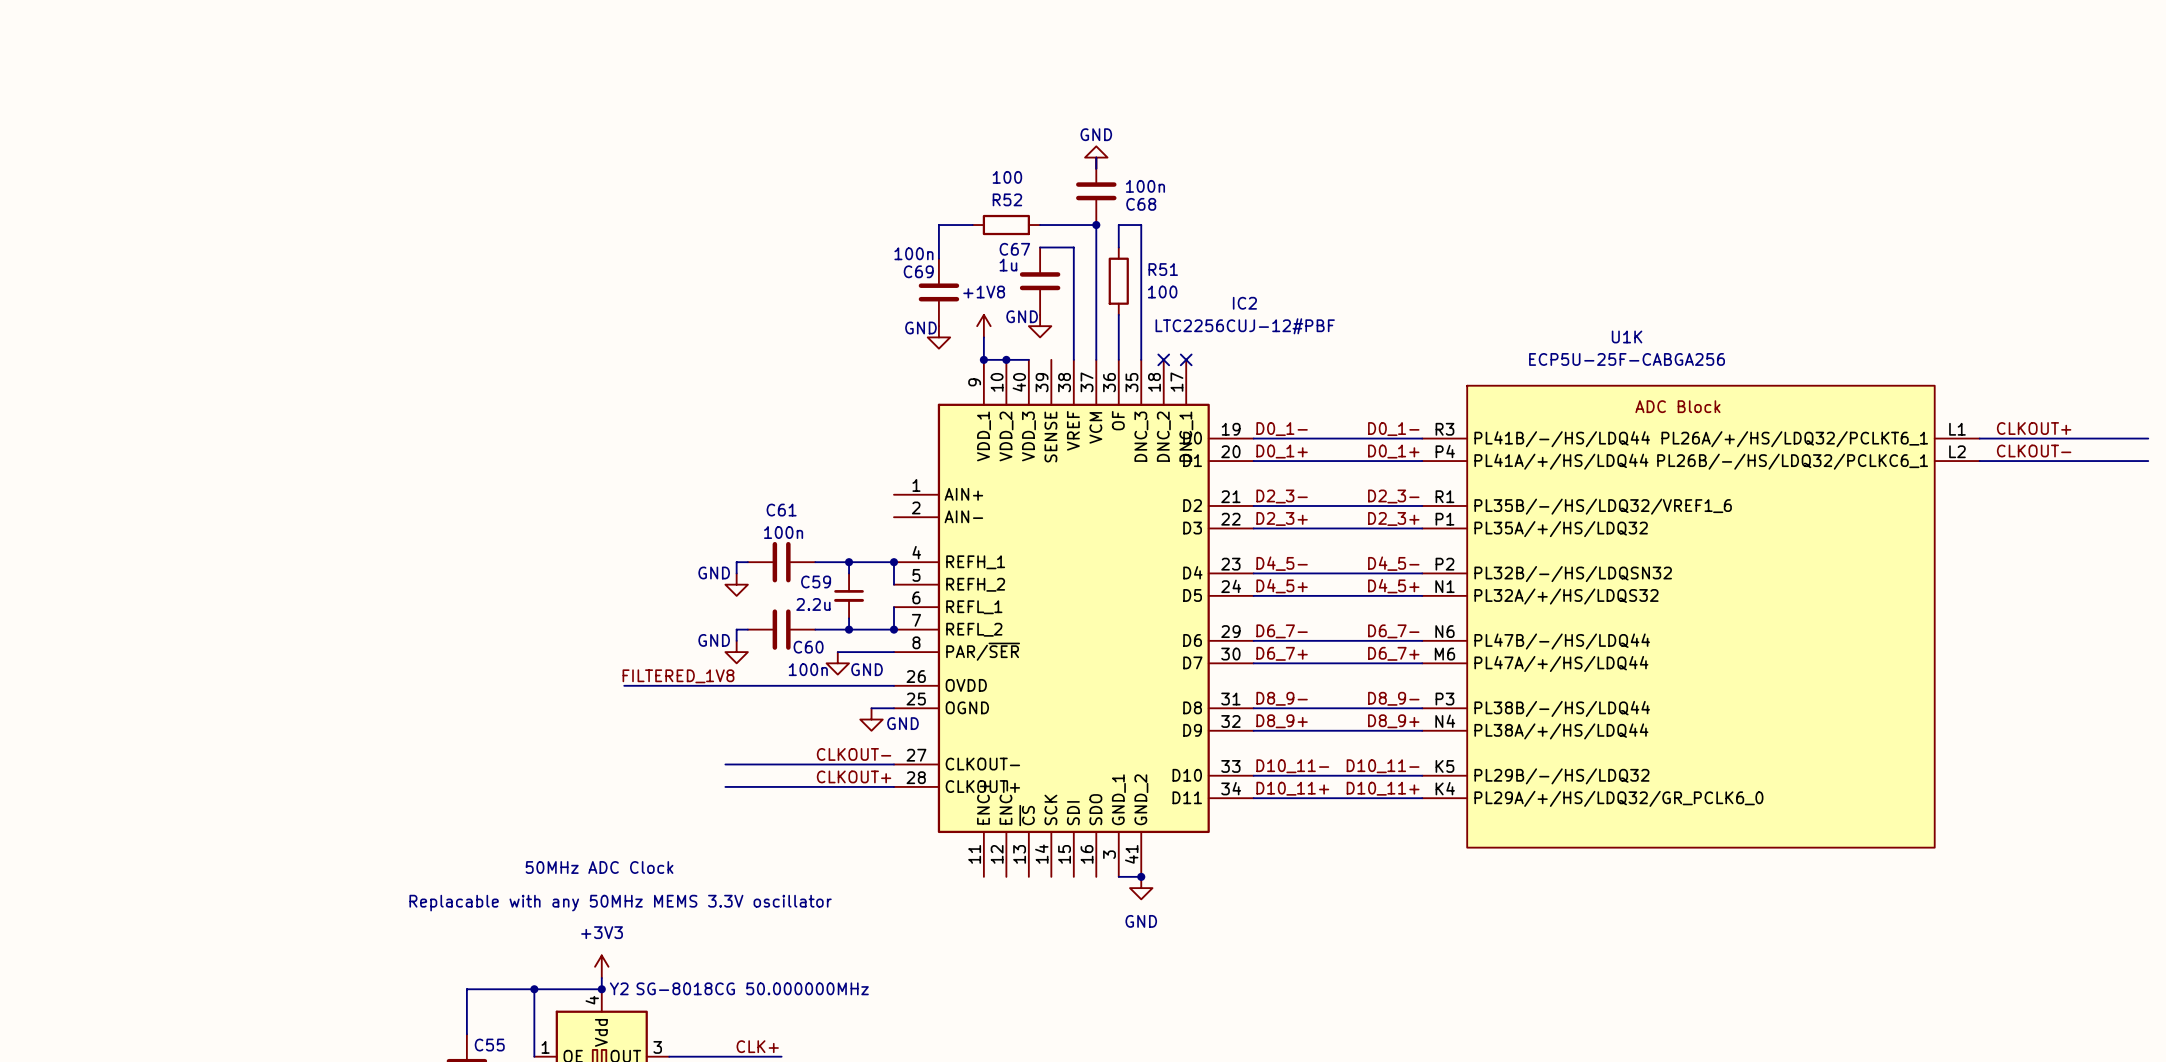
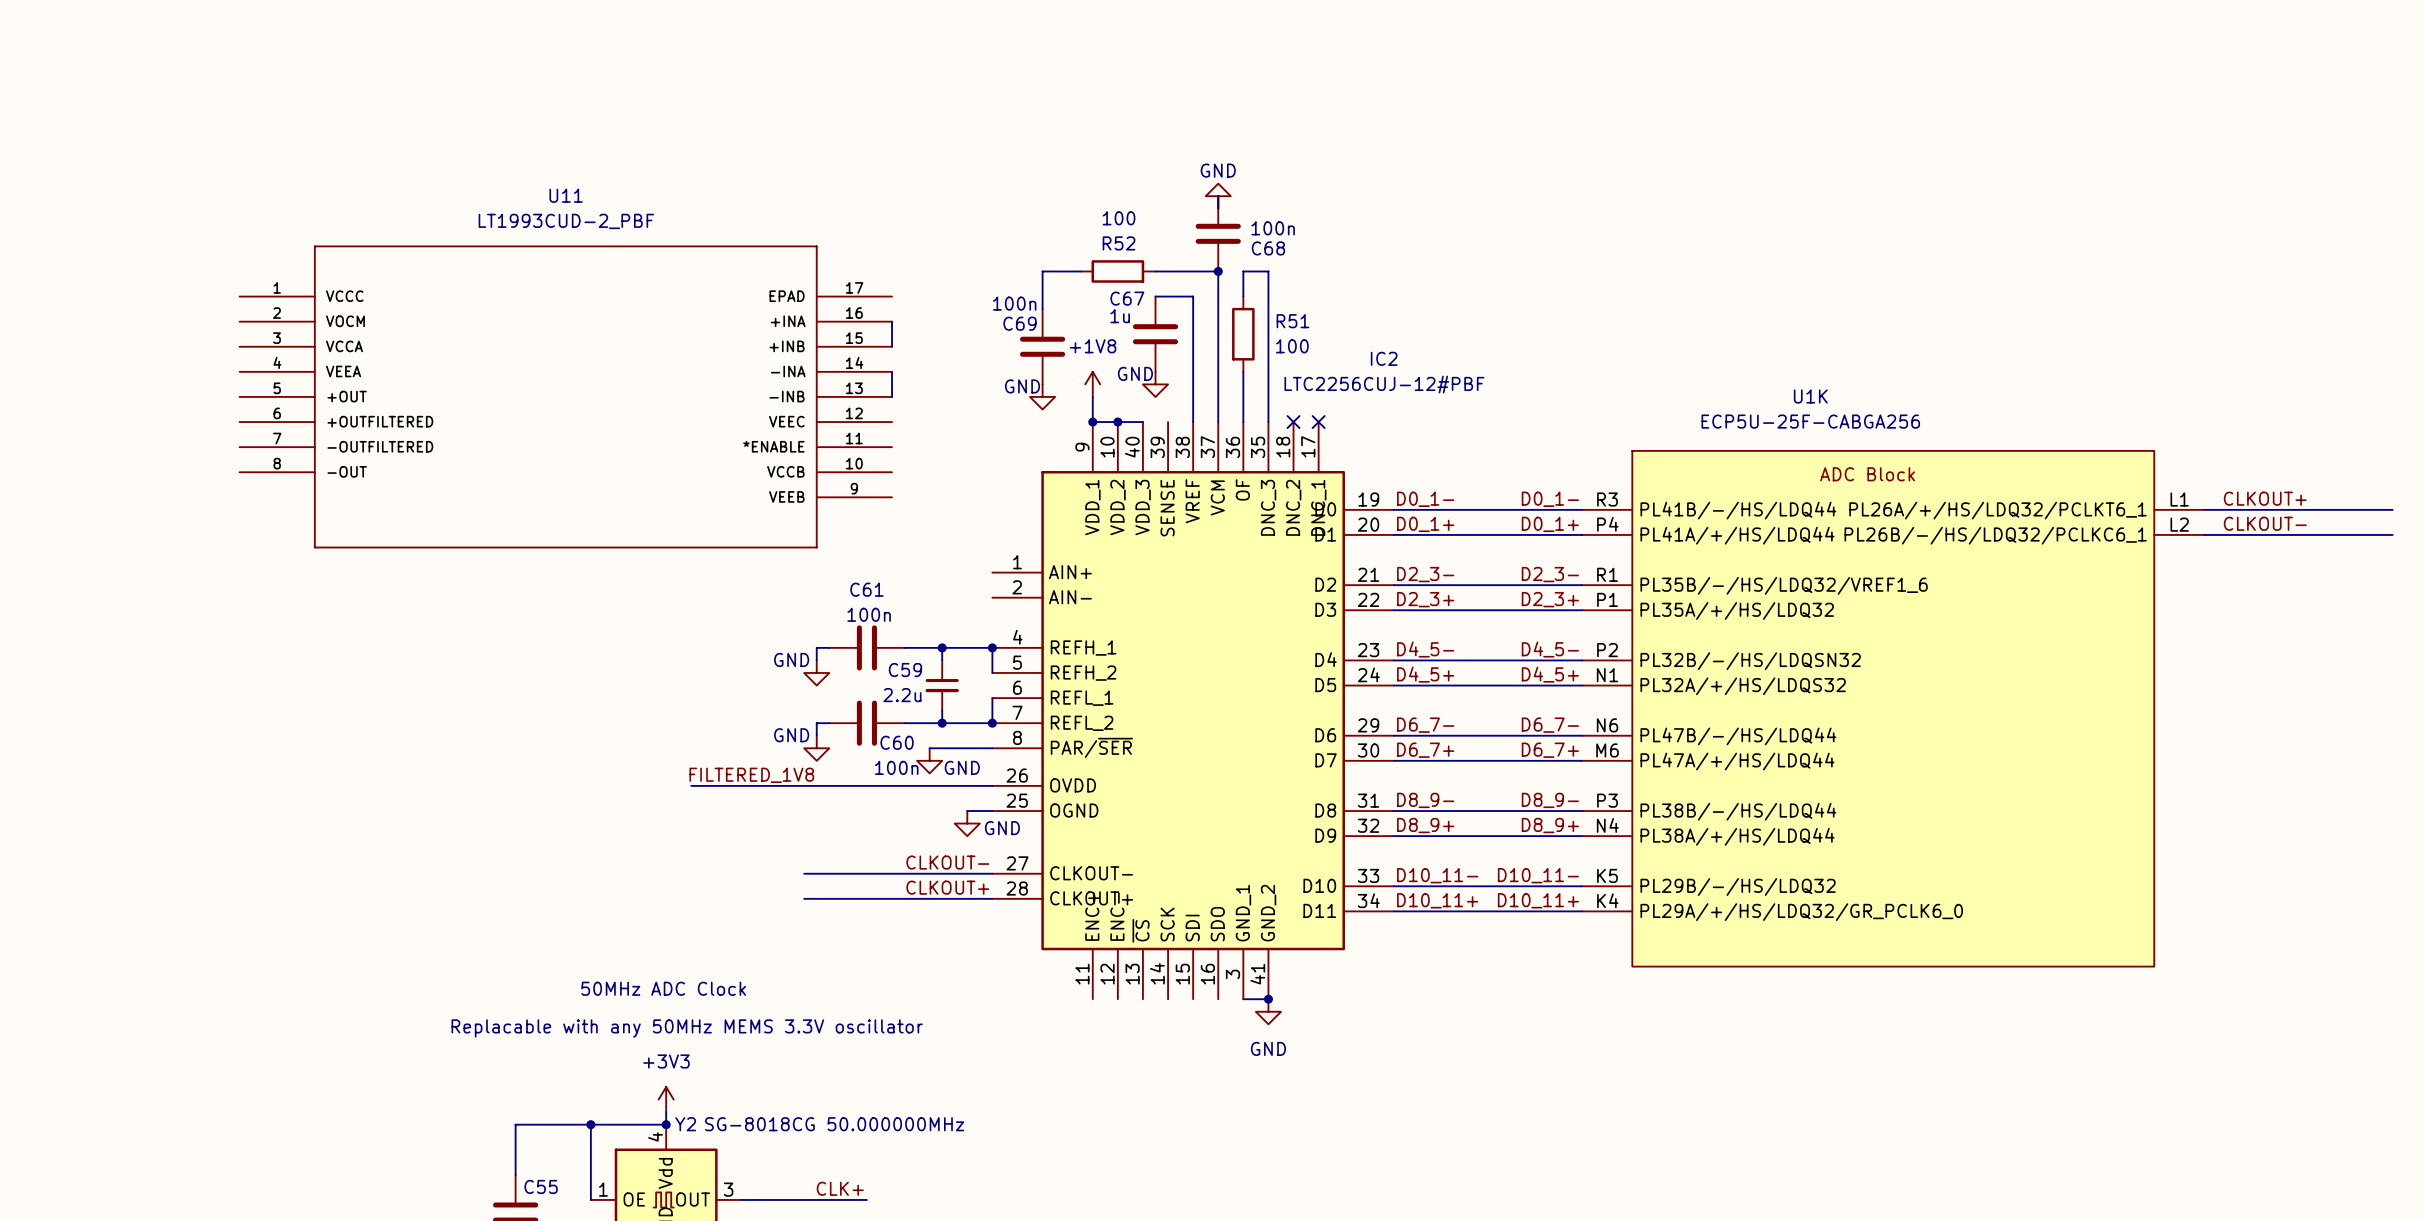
wire: none -> (892, 321) (892, 346)
wire: none -> (892, 371) (892, 396)
U11: none -> LT1993CUD-2_PBF (565, 396)

